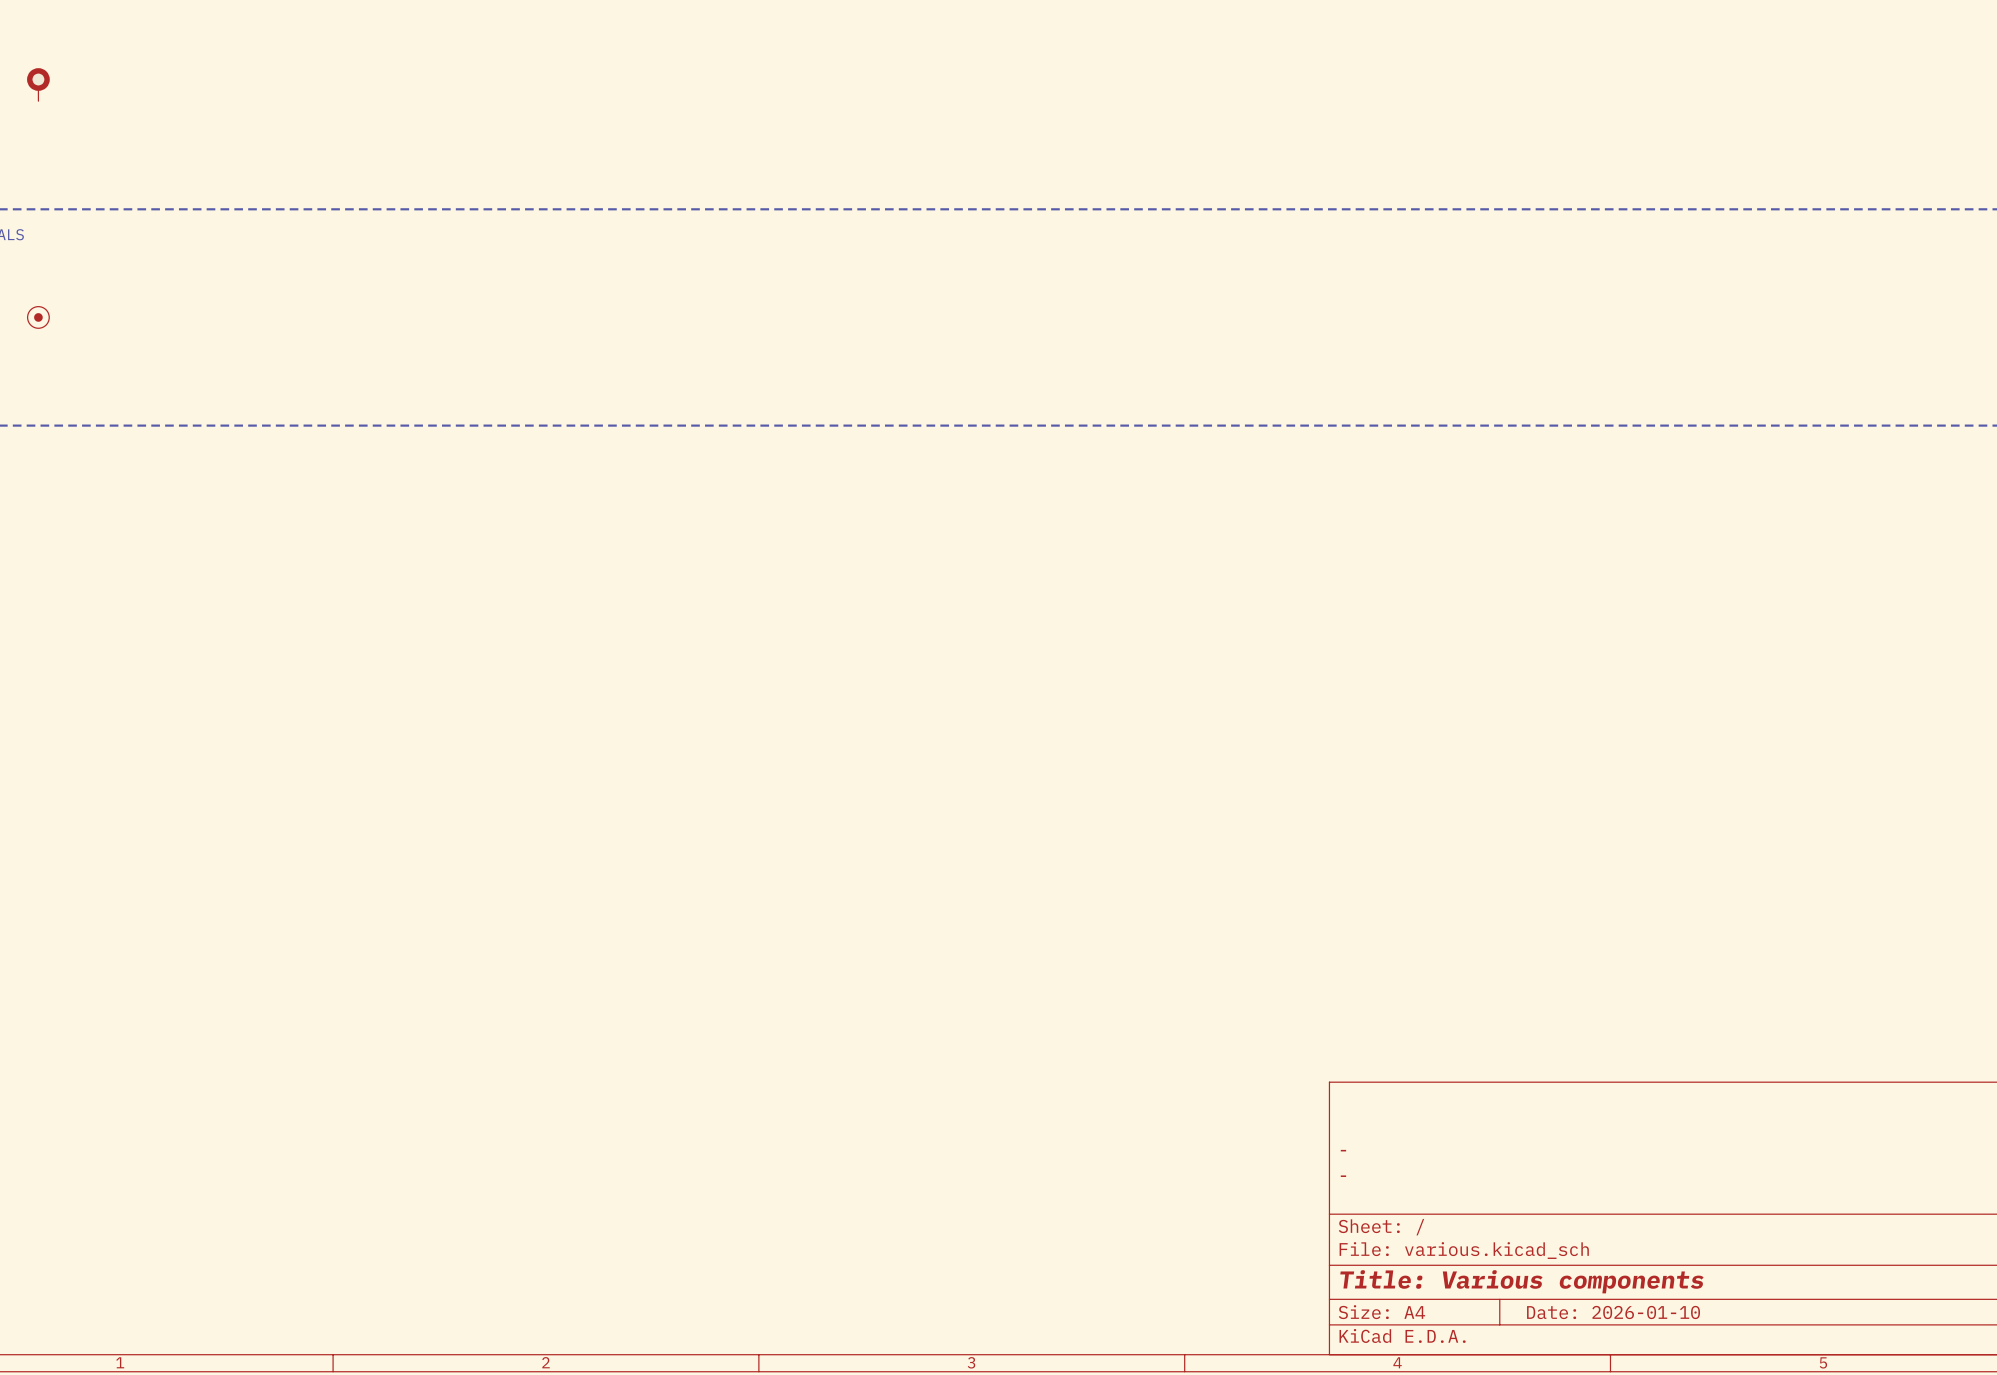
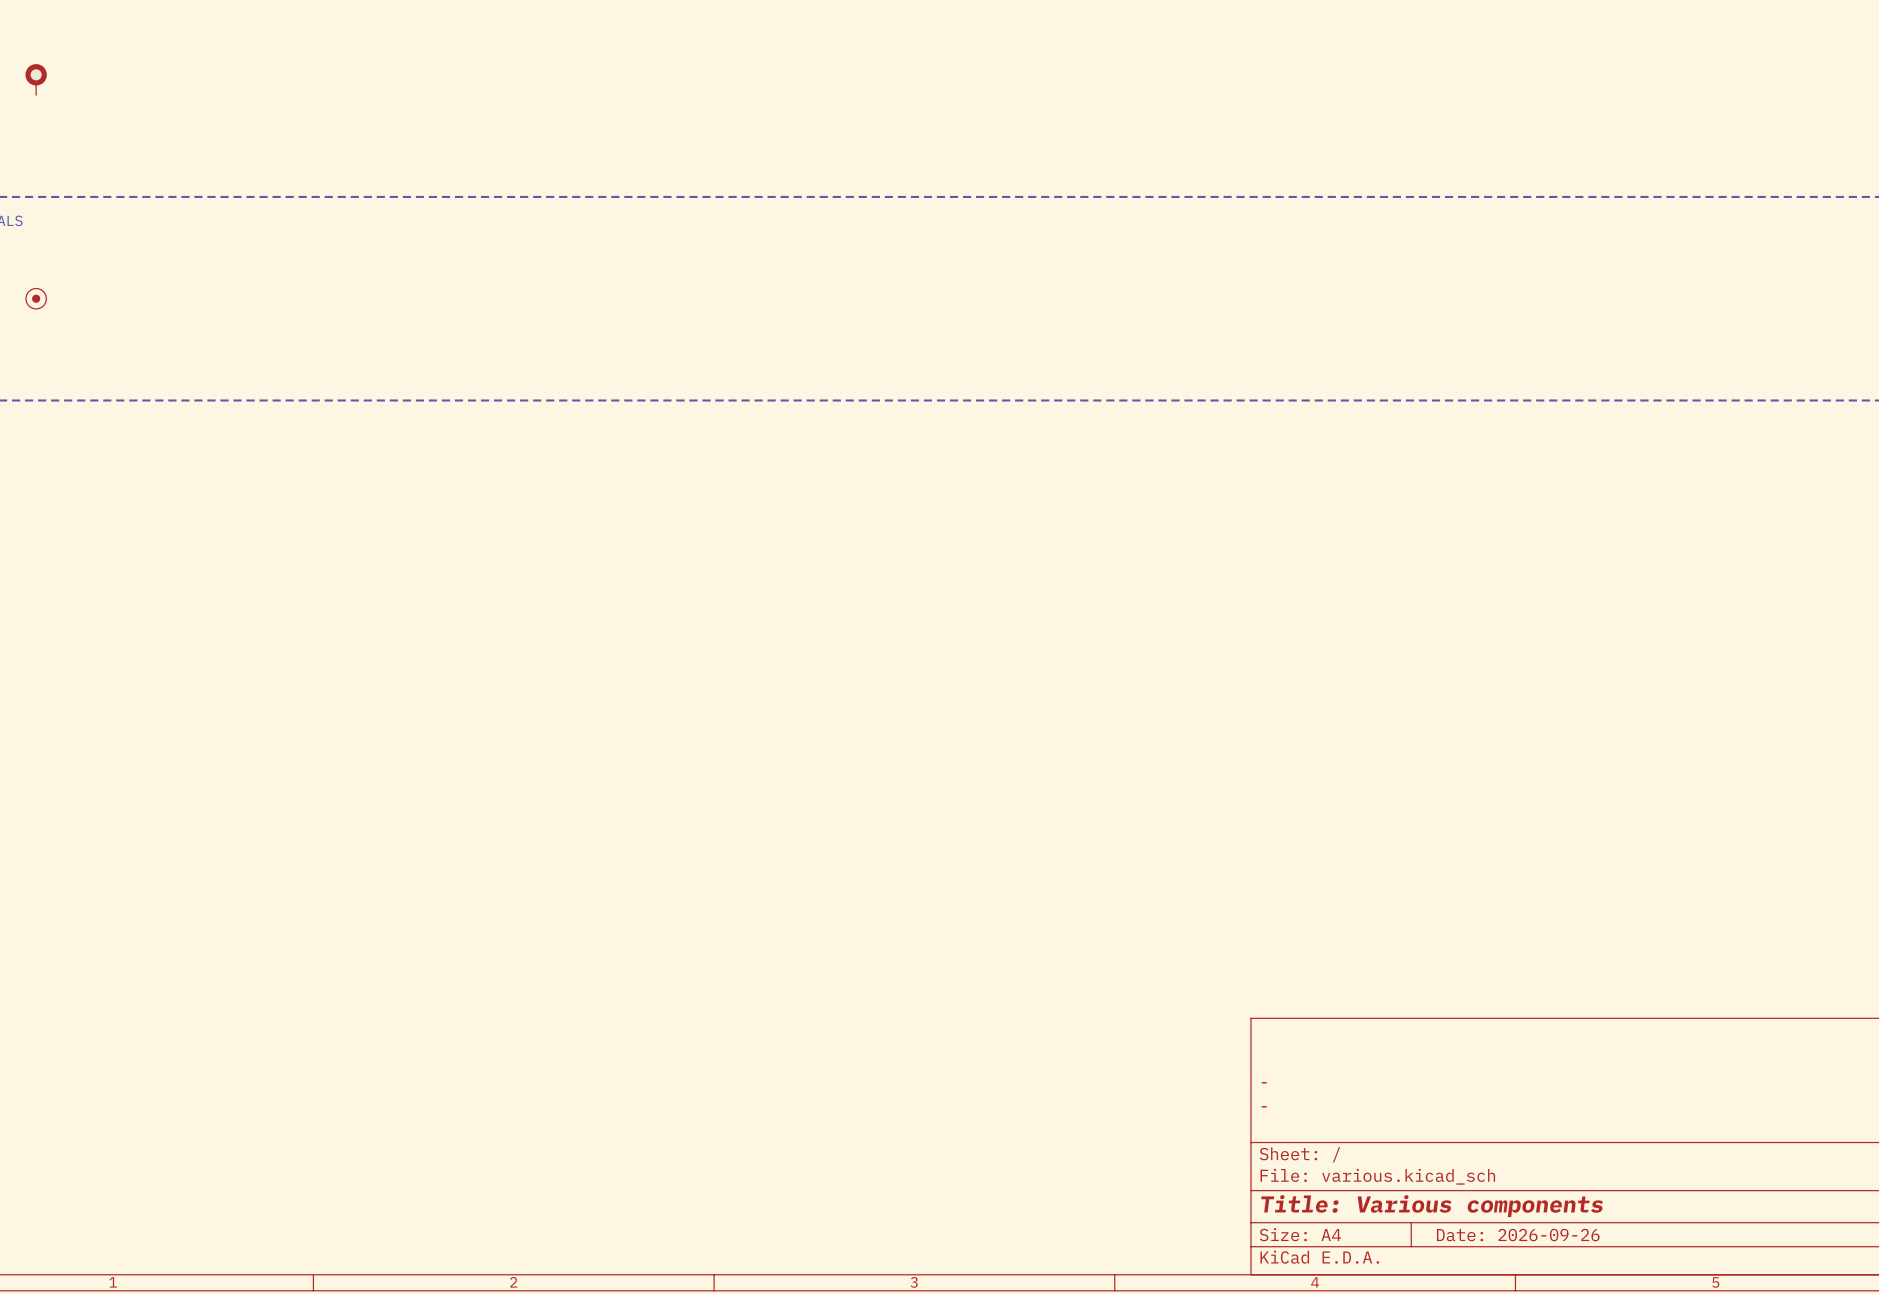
title block: Date: 2026-01-10 (1613, 1312) -> Date: 2026-09-26 (1518, 1235)

